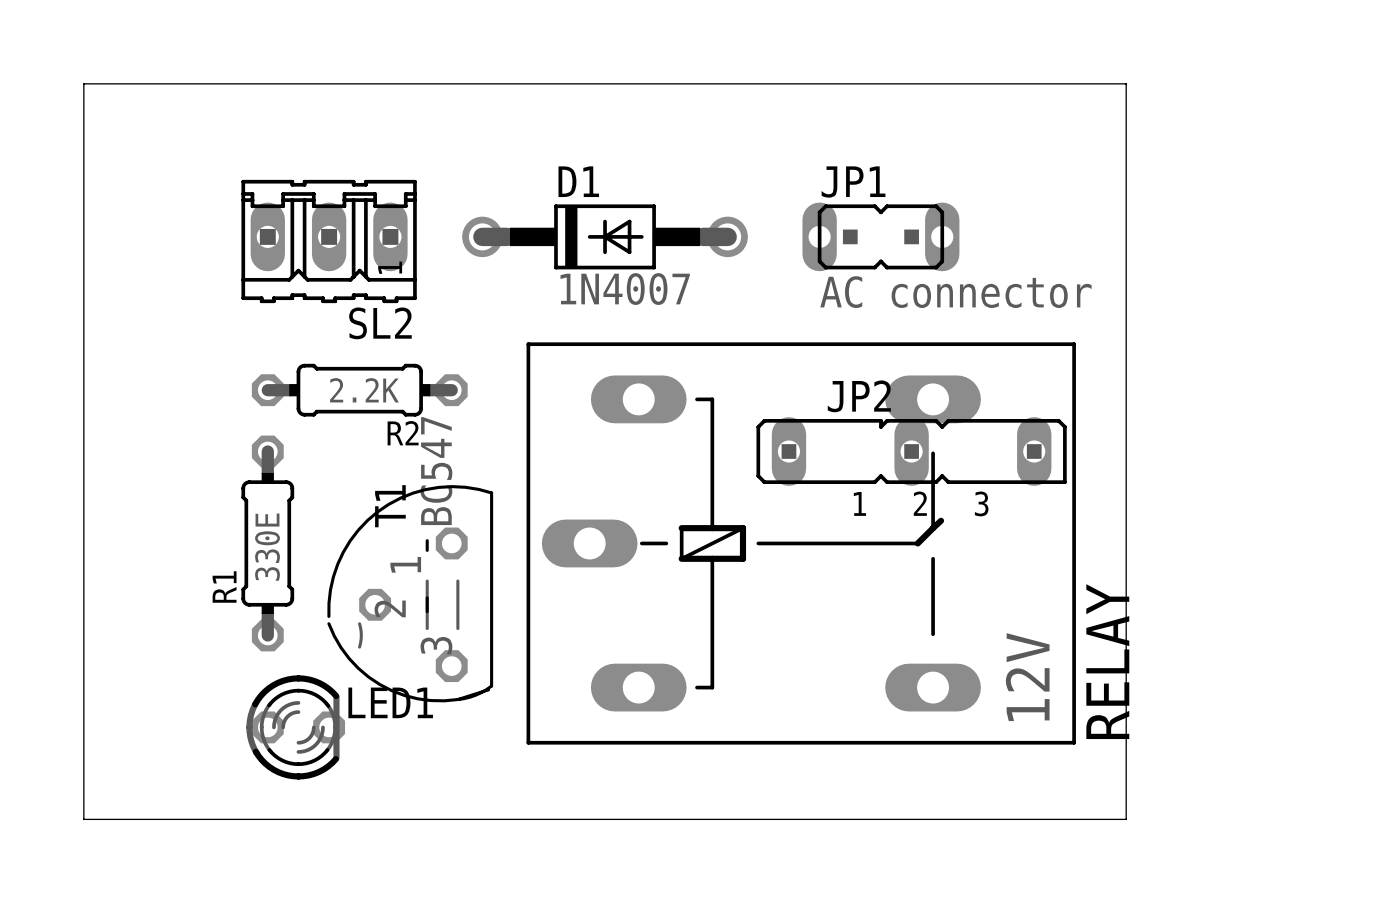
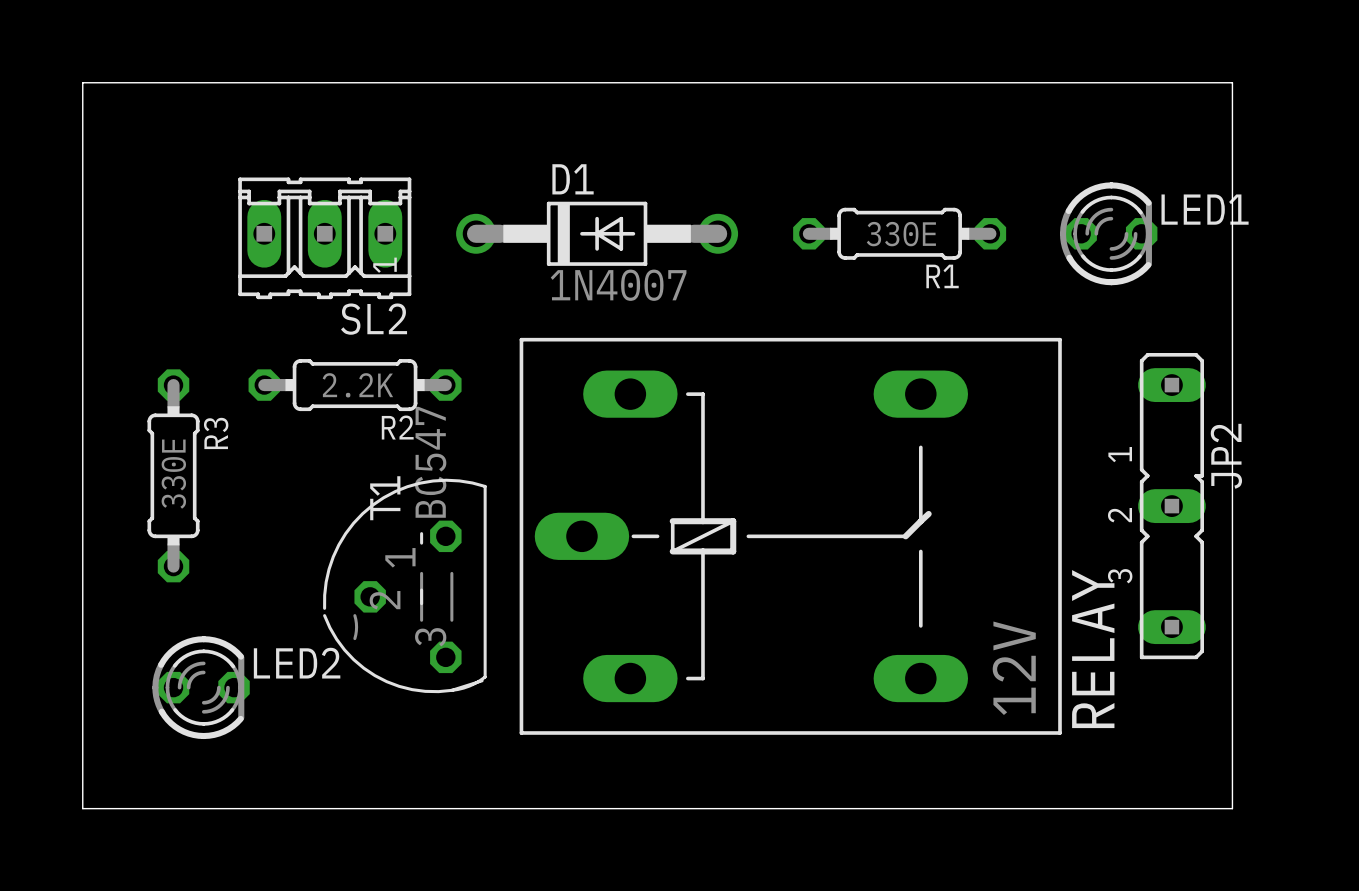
board edge: (1126, 83) (1126, 819) -> (1111, 82) (1232, 82) (1232, 808) (1111, 808)
JP1: AC connector (880, 236) -> none
JP2 name position: JP2 (859, 396) -> JP2 (1226, 456)
JP2 footprint: [756, 417, 1067, 486] -> [1138, 352, 1206, 660]
R3: none -> 330E (173, 475)
R1 rotation: 0° (267, 543) -> 90° clockwise (899, 233)
R1 position: (267, 543) -> (899, 233)
R1 name position: R1 (224, 586) -> R1 (942, 276)
LED2: none -> (201, 687)
LED1 position: (295, 727) -> (1108, 233)

